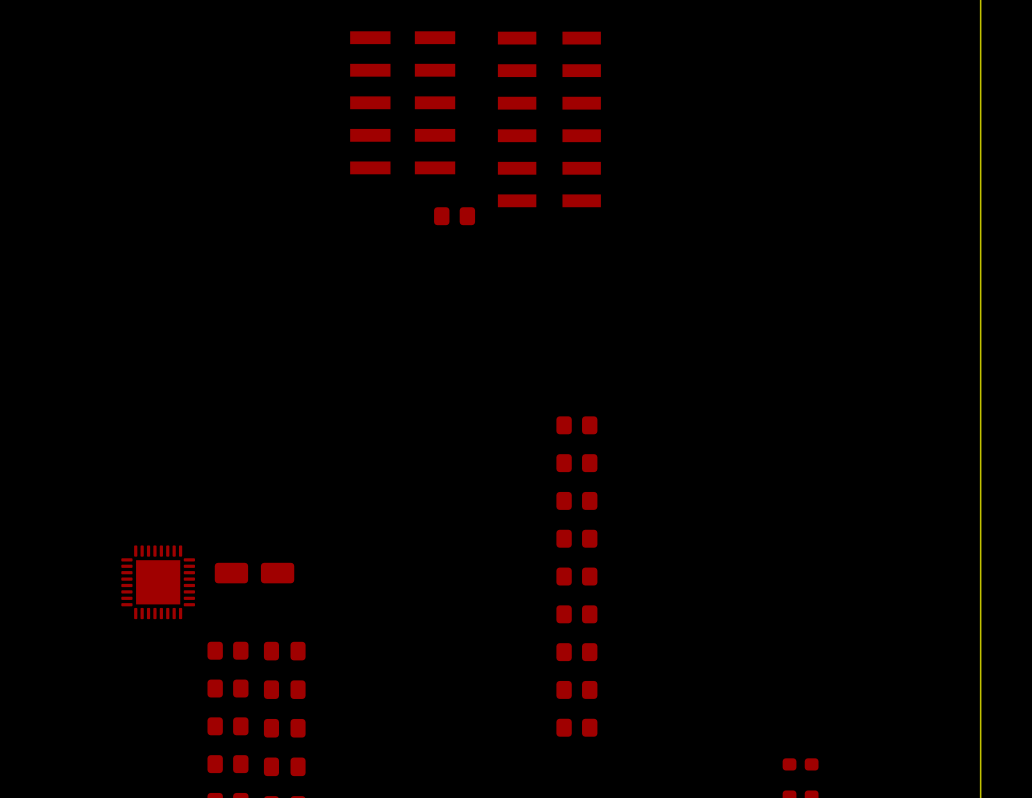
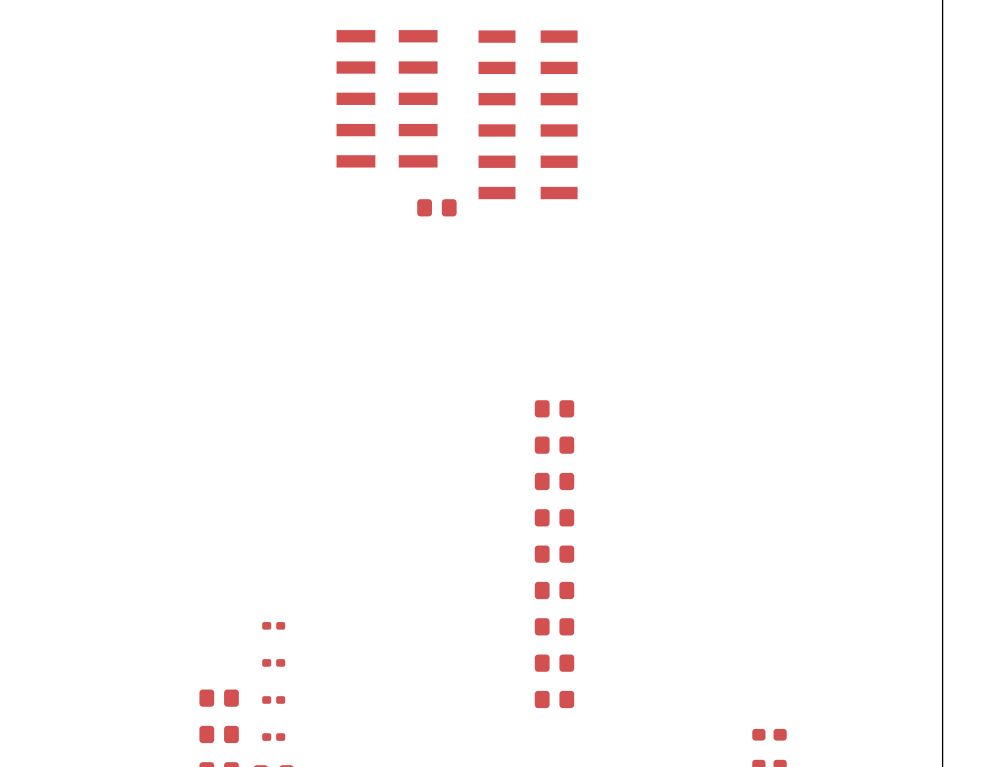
part: (254, 573) -> none
part: (158, 582) -> none
part footprint: [263, 641, 306, 661] -> [262, 622, 286, 630]
part: (227, 650) -> none
part footprint: [263, 680, 306, 699] -> [262, 659, 286, 667]
part: (227, 688) -> none
part footprint: [263, 718, 306, 738] -> [262, 696, 286, 704]
part footprint: [263, 757, 306, 777] -> [262, 733, 286, 741]

